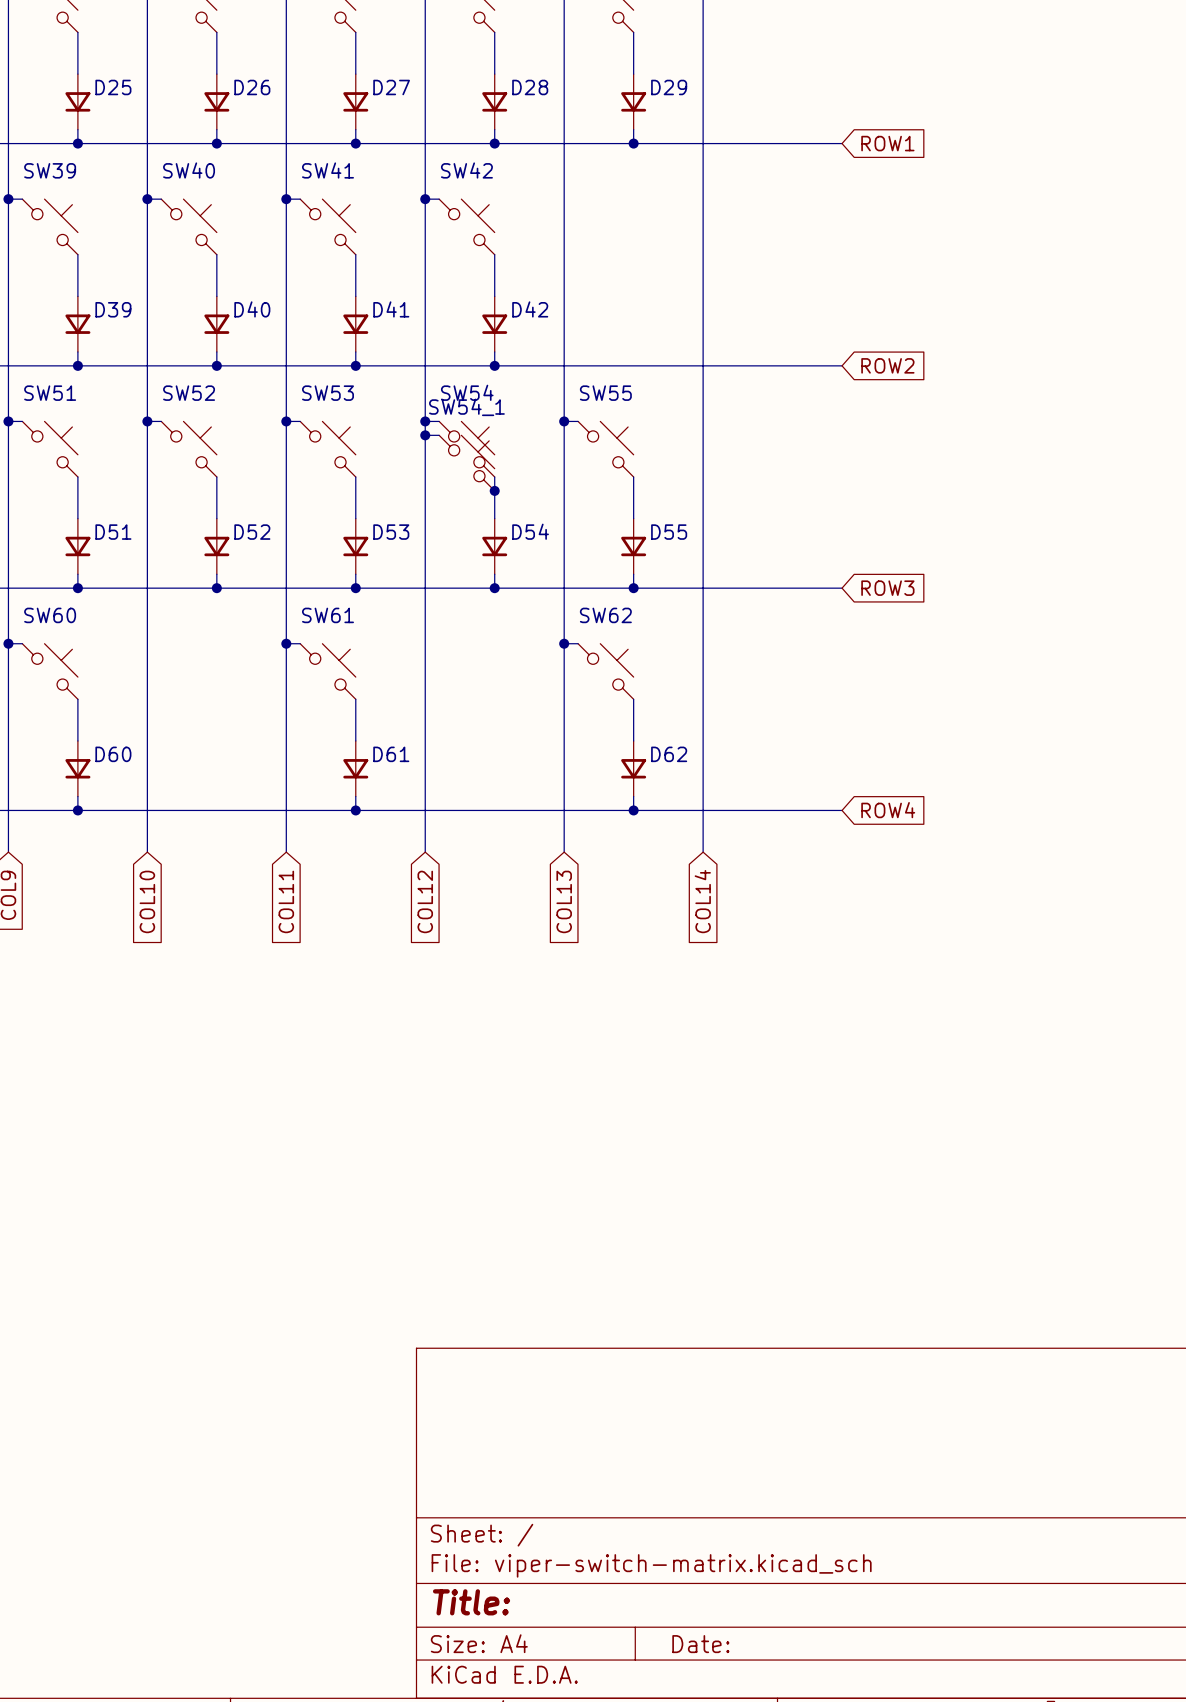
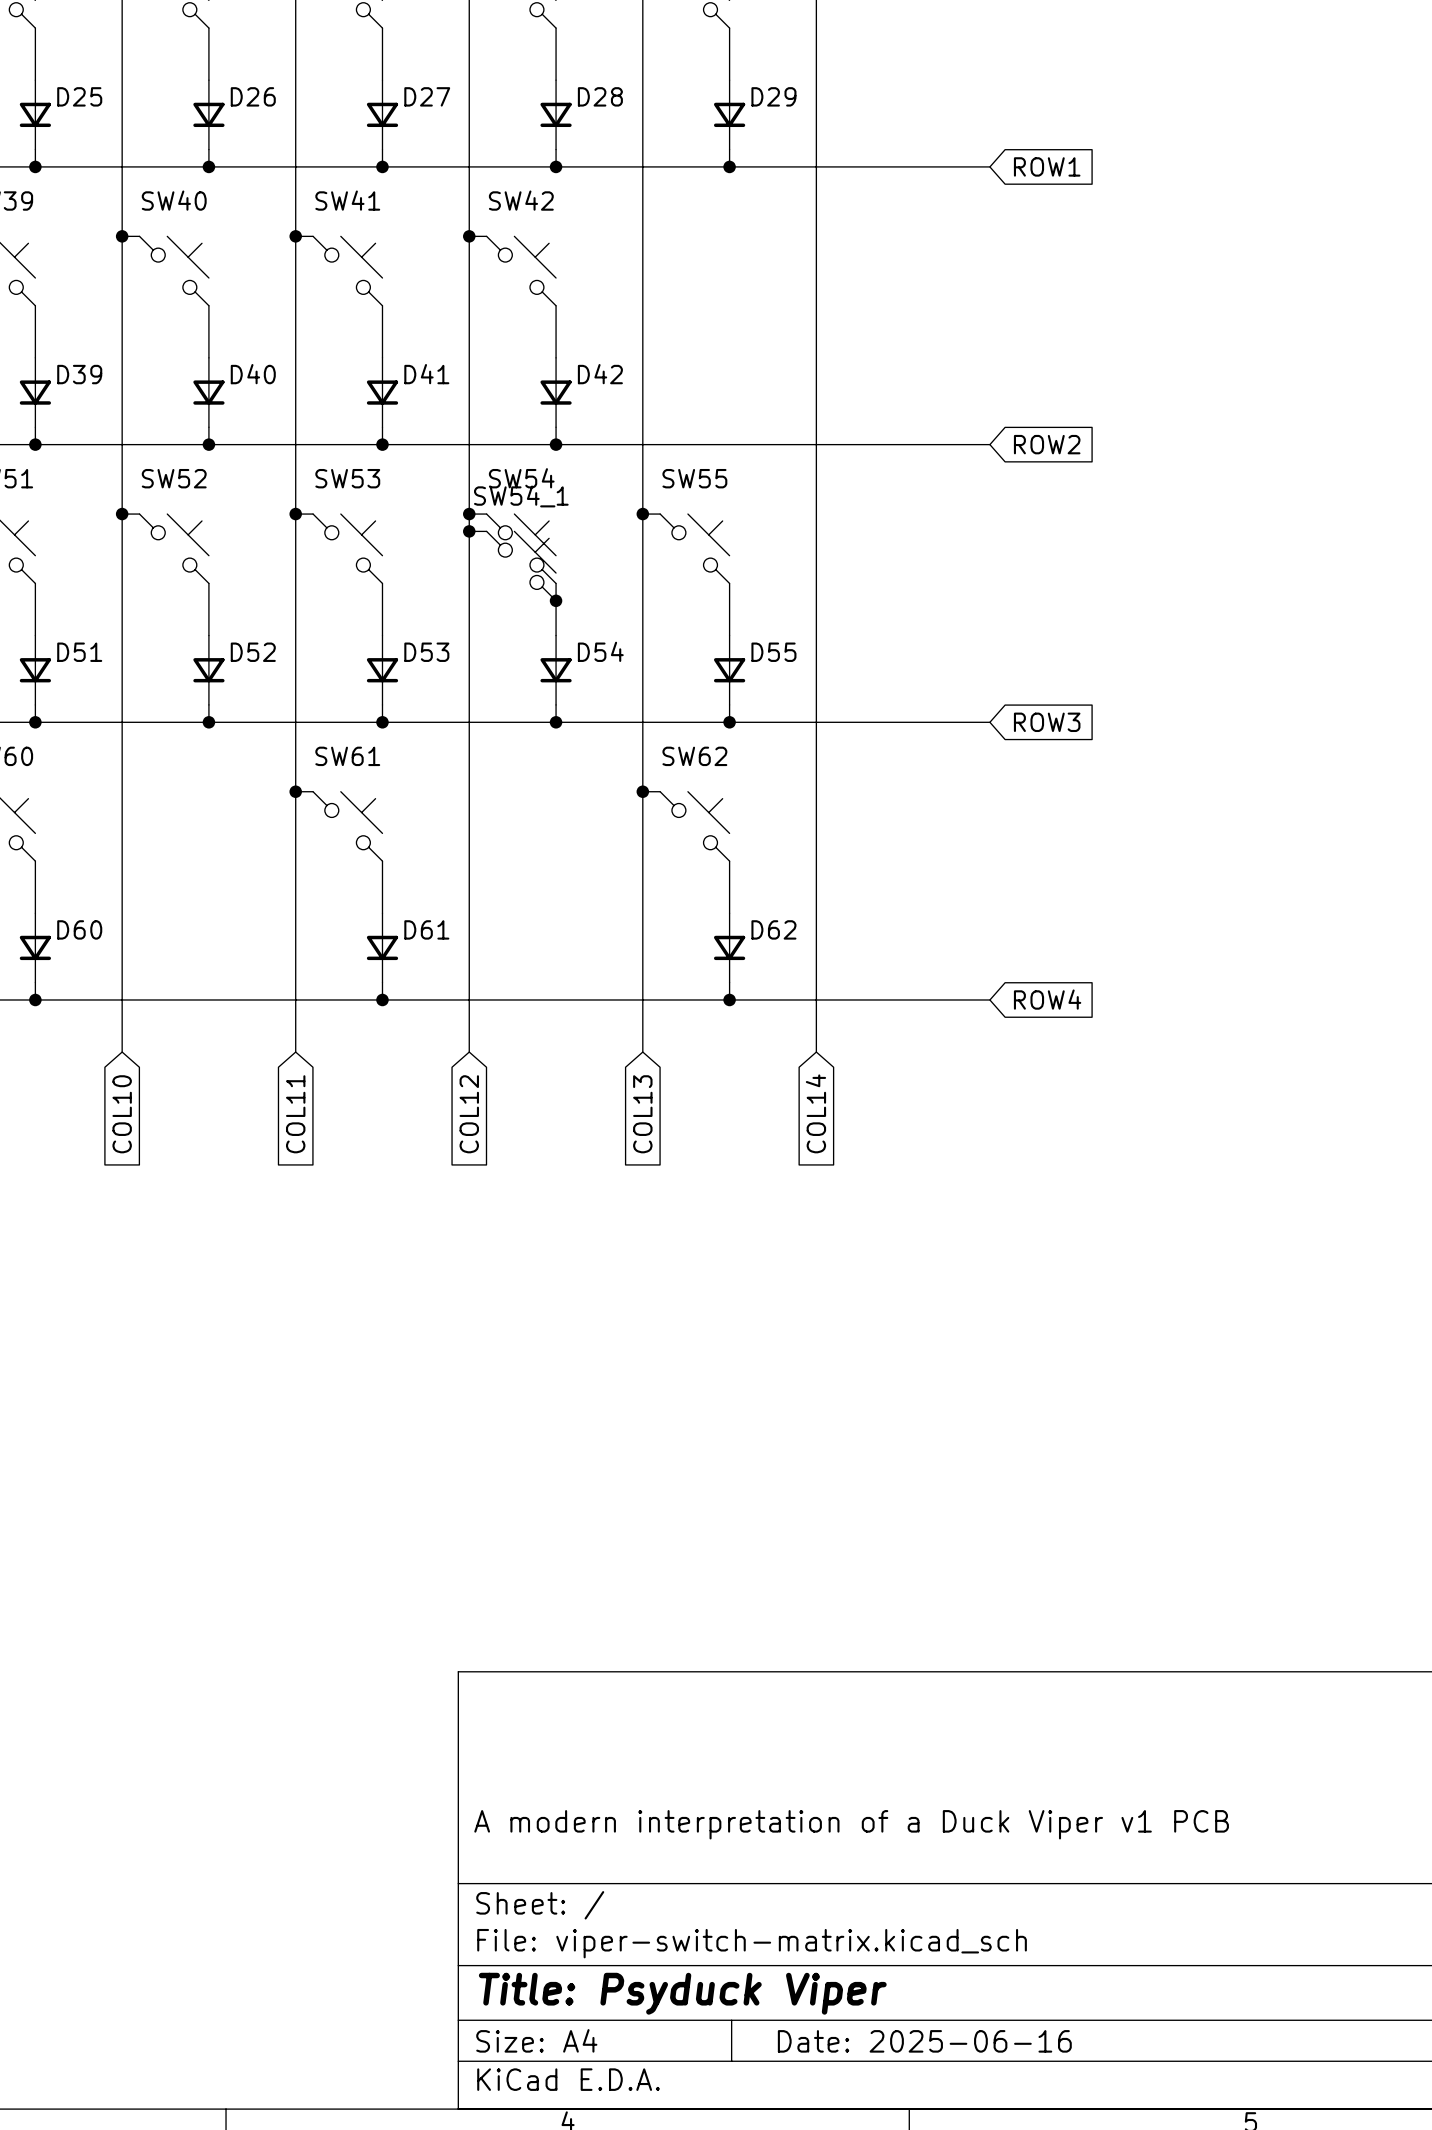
title block: none -> A modern interpretation of a Duck Viper v1 PCB (851, 1824)
title block: Title: (471, 1602) -> Title: Psyduck Viper (682, 1993)
title block: Date: (700, 1644) -> Date: 2025-06-16 (924, 2041)

